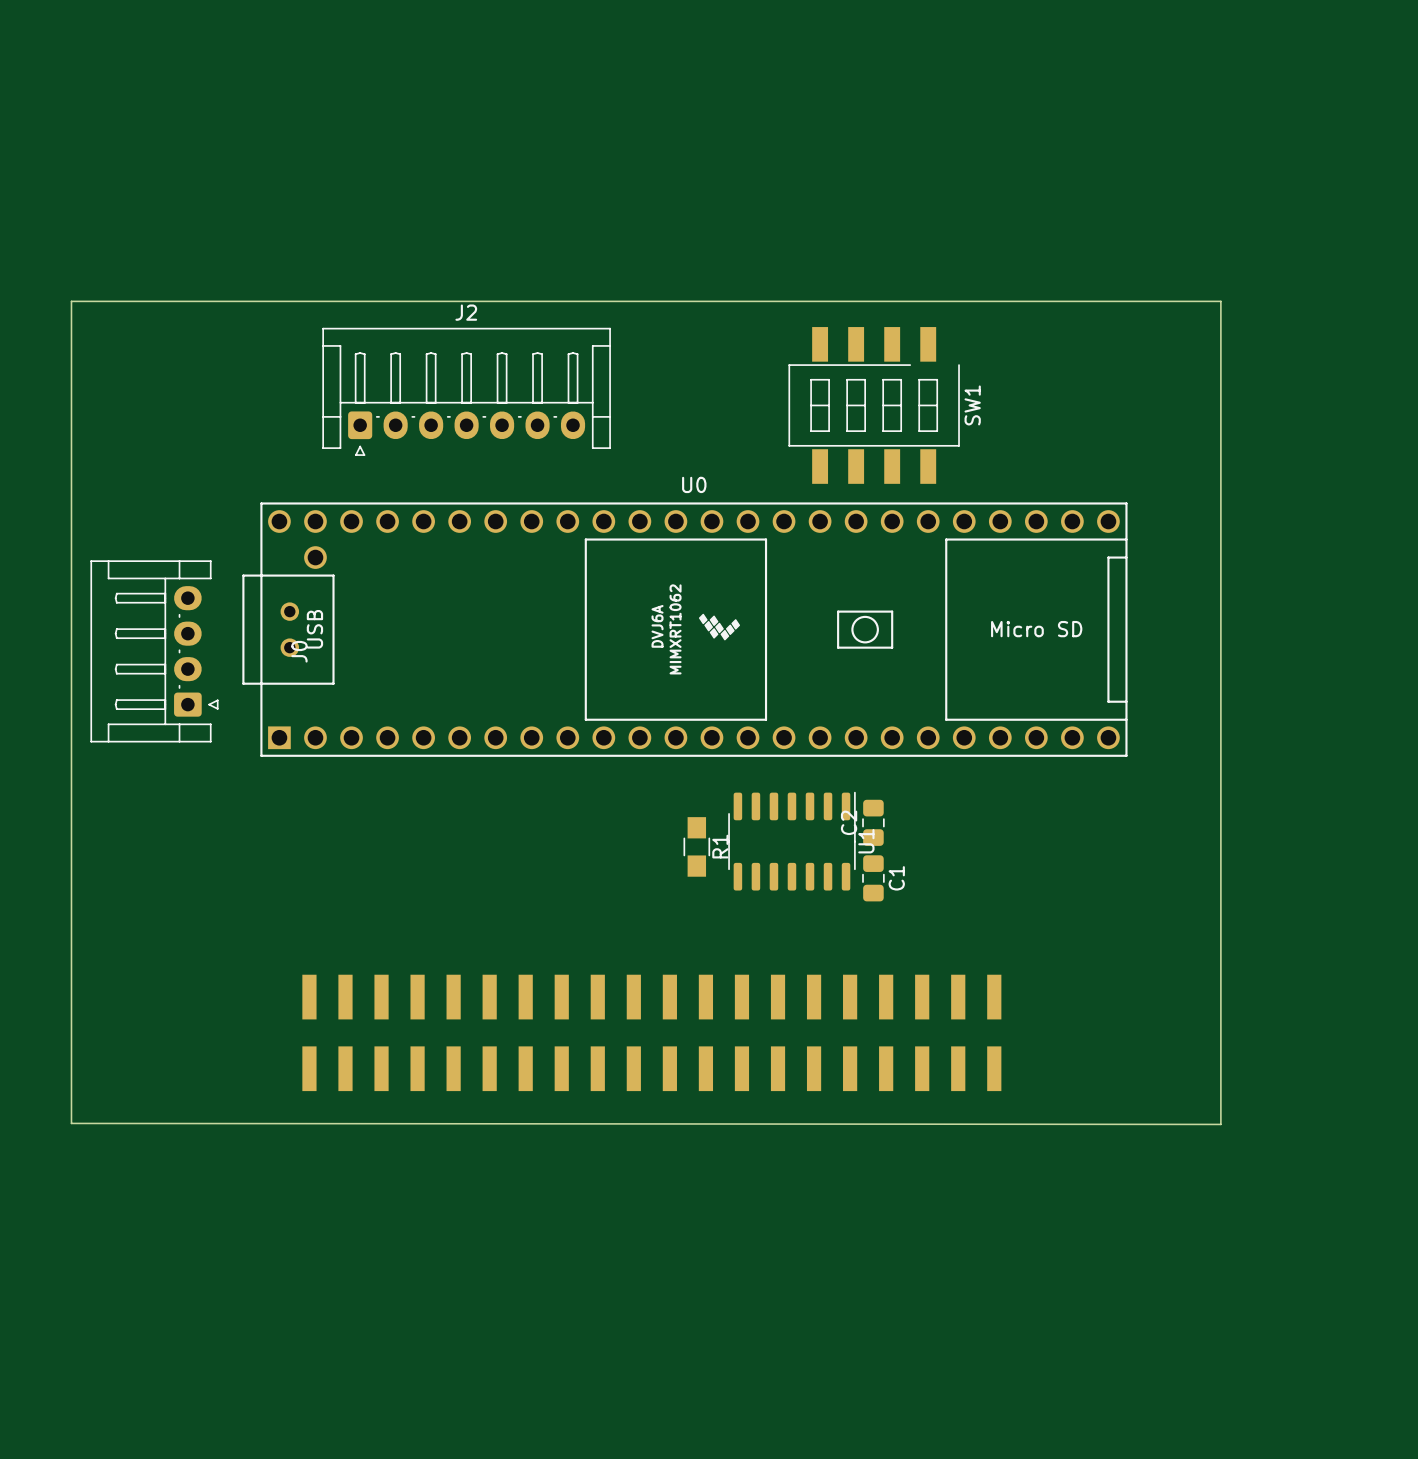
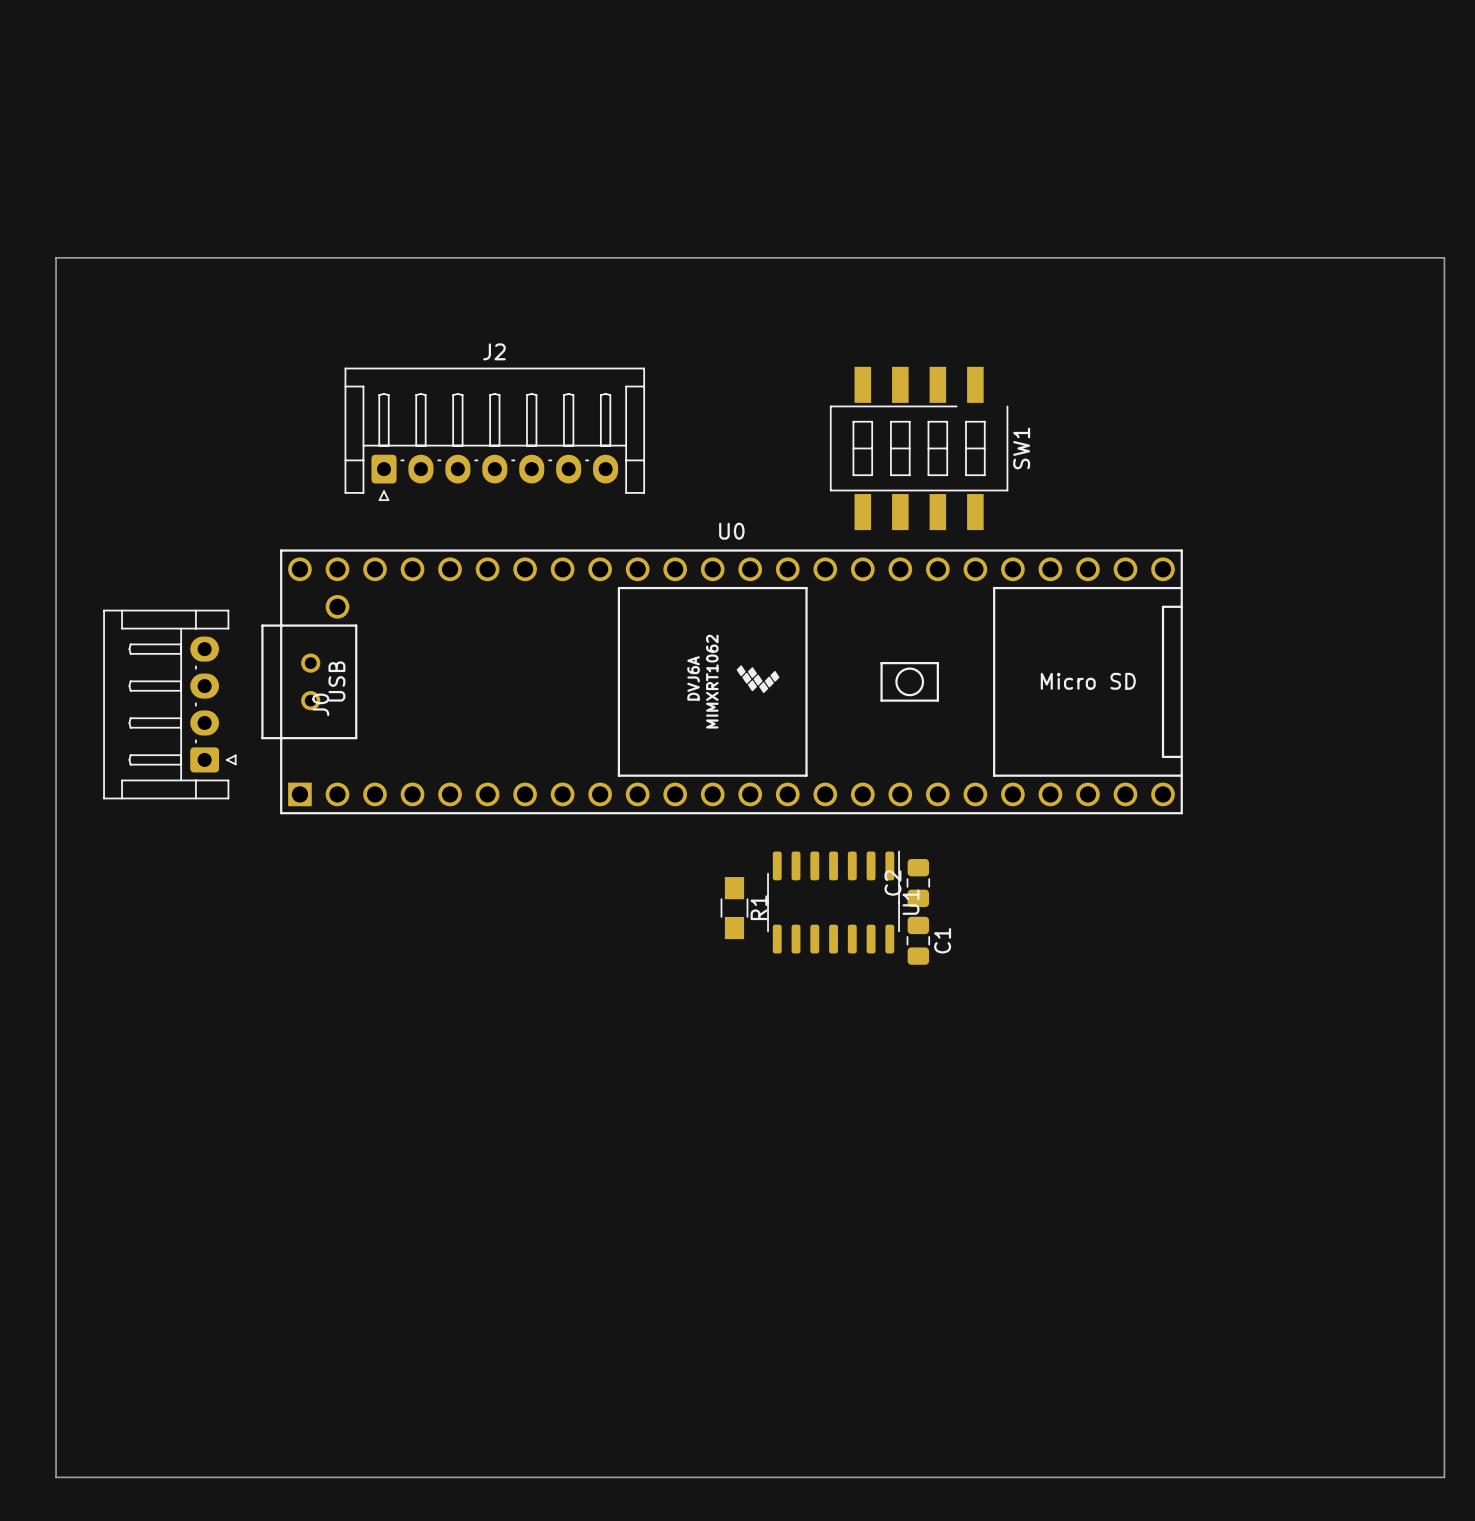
board edge: (71, 301) (1220, 301) (1220, 1124) (71, 1123) (71, 301) -> (56, 257) (56, 1477) (1444, 1477) (1444, 257) (56, 257)
part: (651, 1032) -> none

